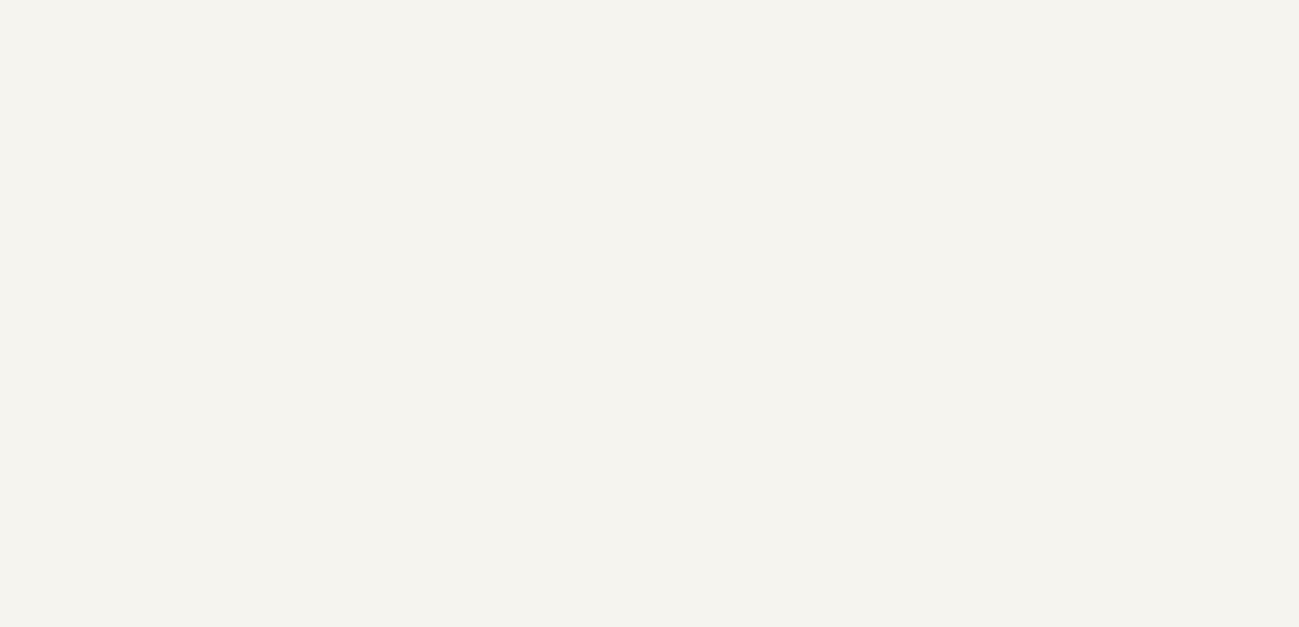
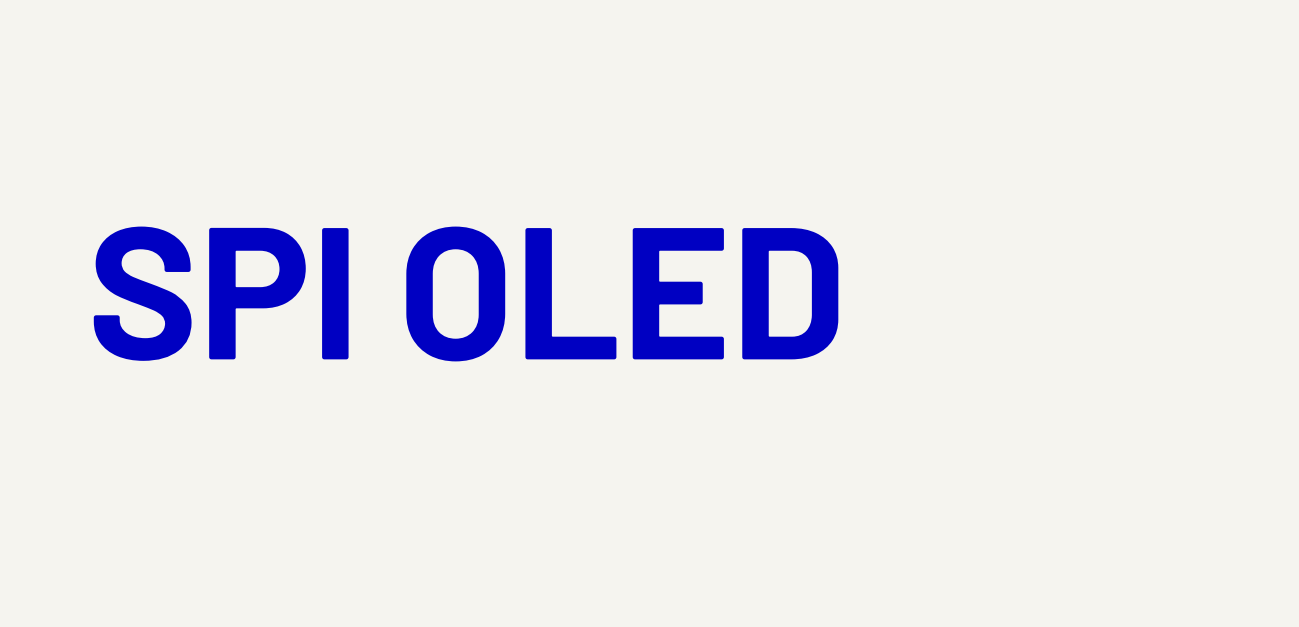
text: none -> SPI OLED (466, 293)

